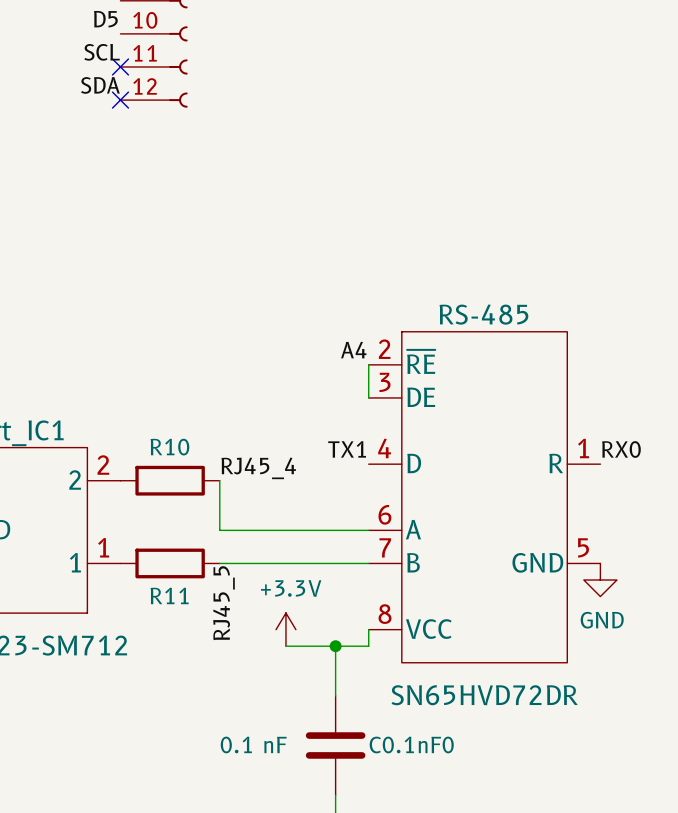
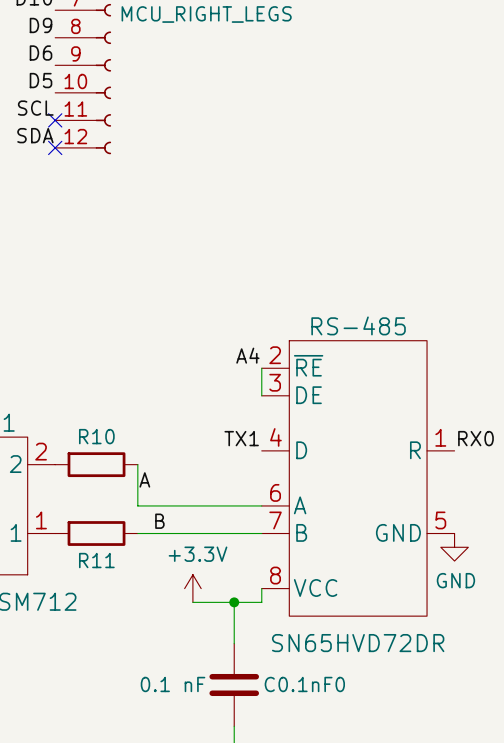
label: RJ45_4 (258, 468) -> none
label: none -> A (144, 479)
label: RJ45_5 (224, 603) -> B (159, 521)

